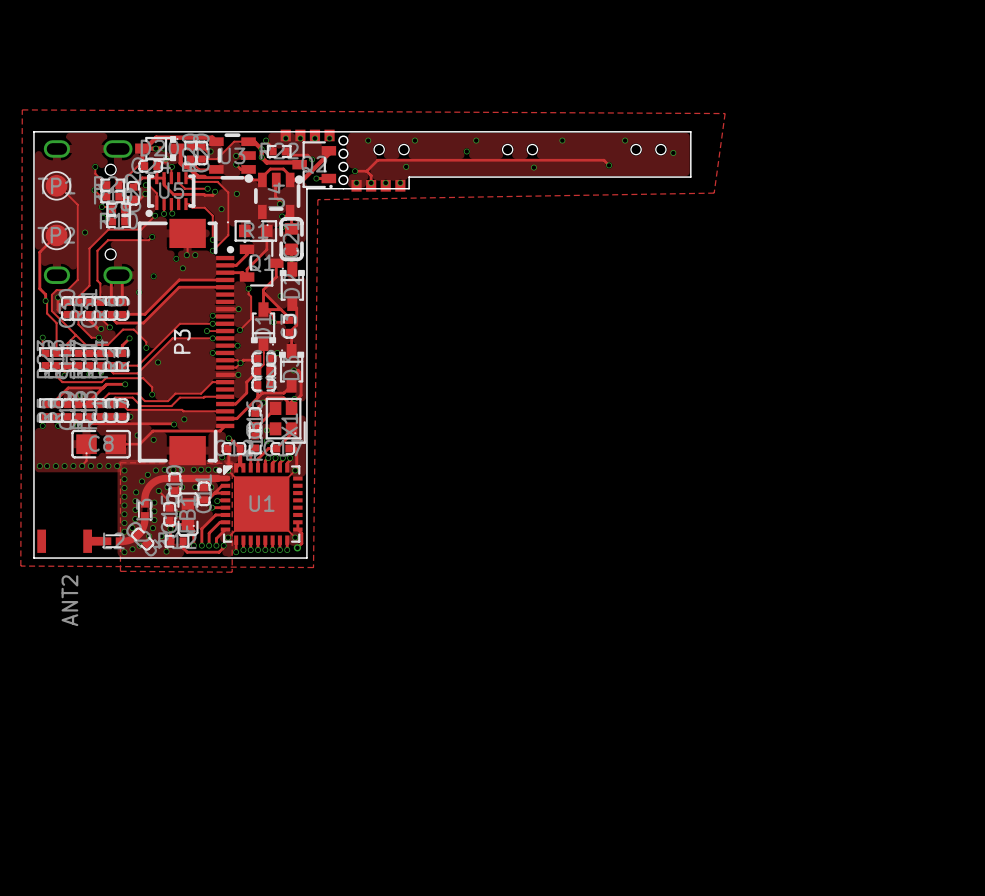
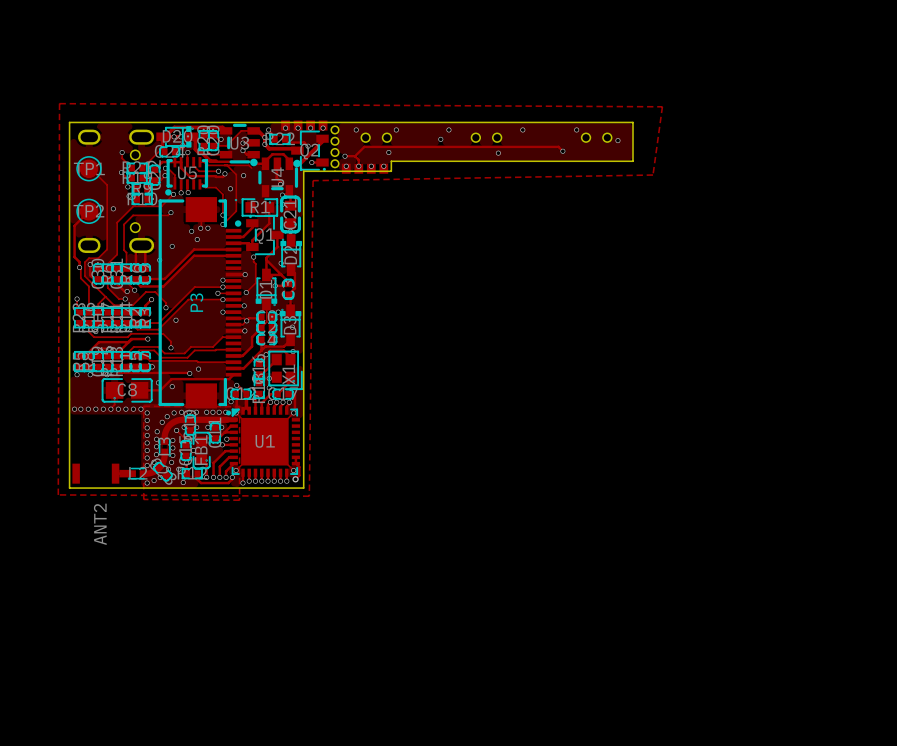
track: none -> (227, 165) (248, 165) (251, 168)
track: (293, 370) (298, 370) (301, 373) (301, 395) (291, 401) (291, 405) -> none

